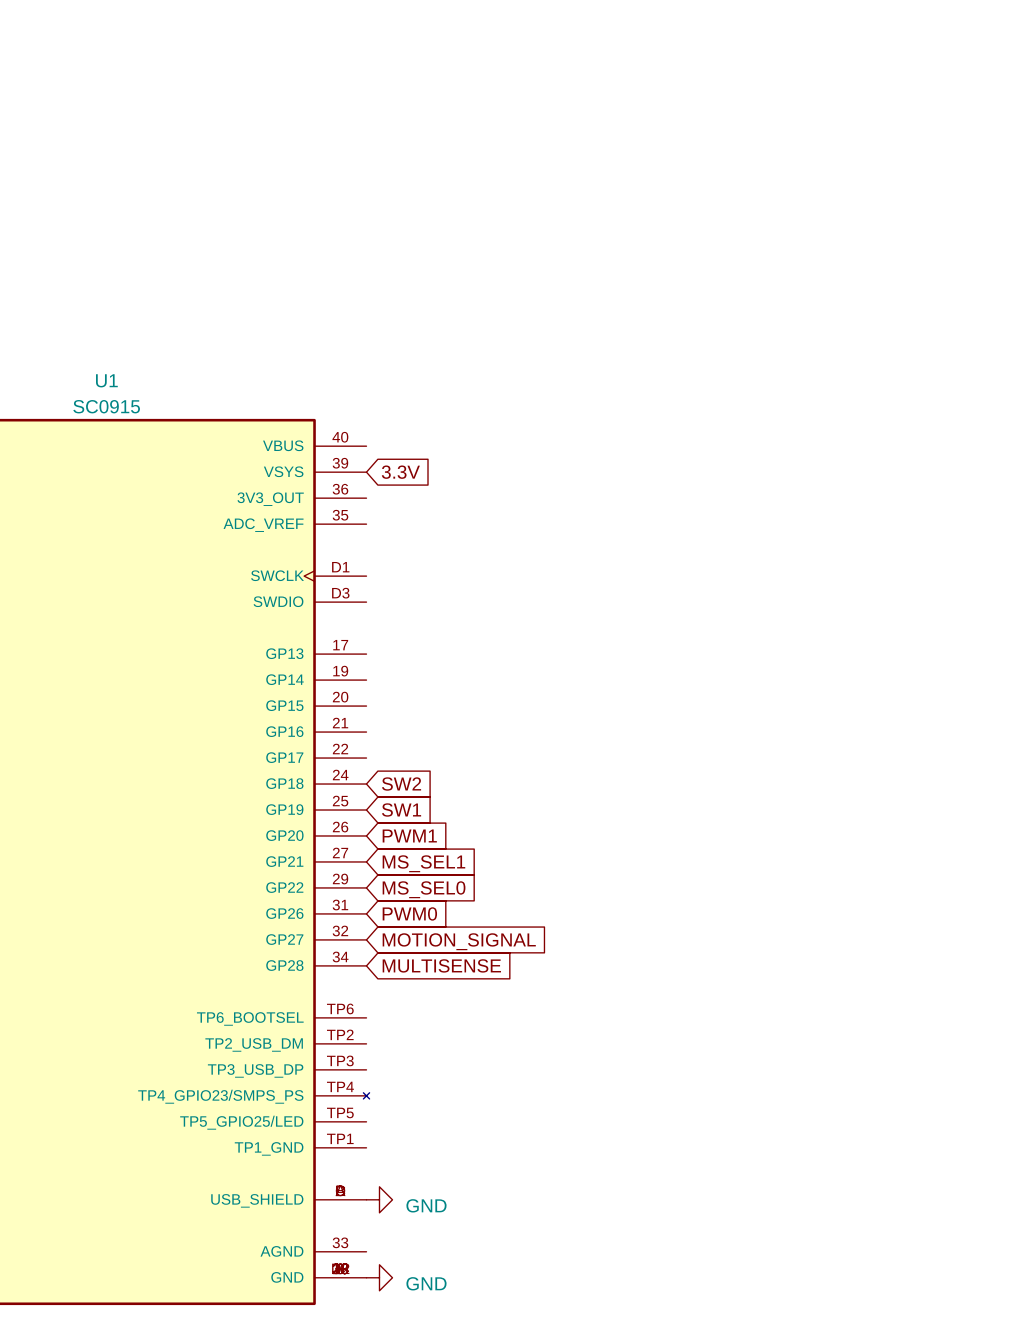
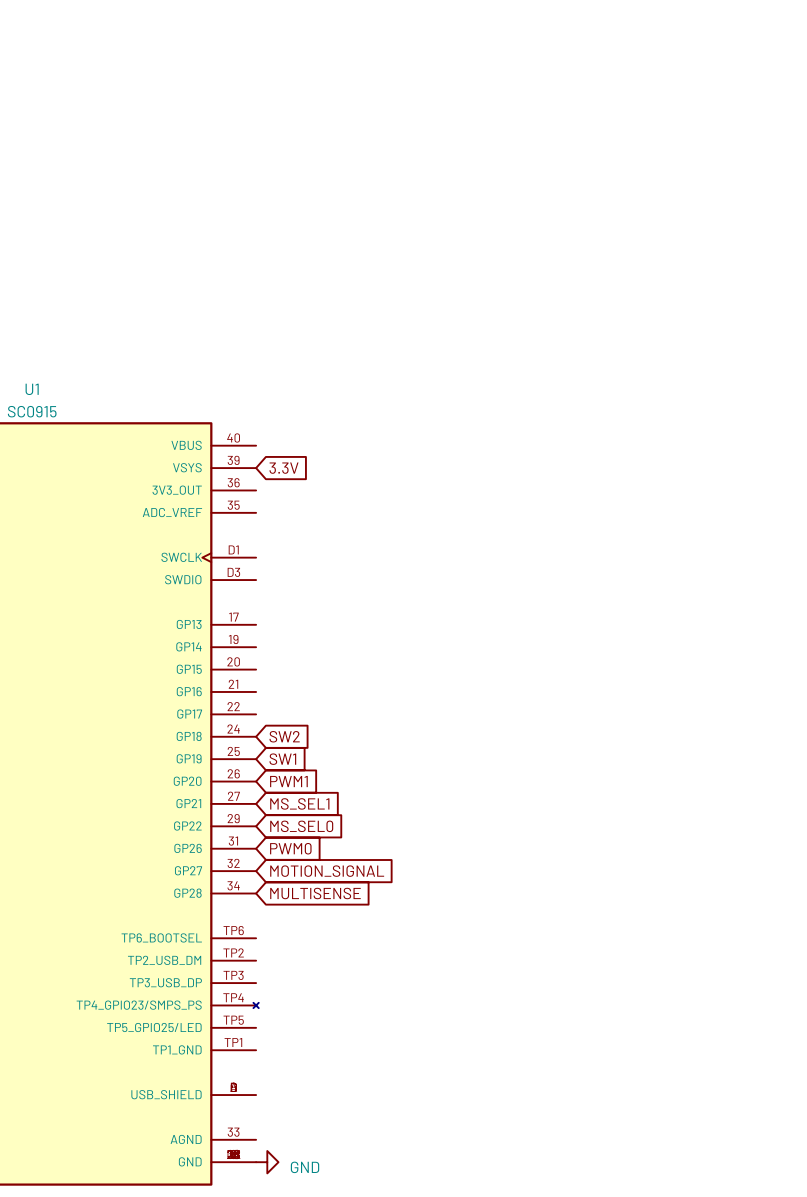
power symbol: GND (379, 1199) -> none

